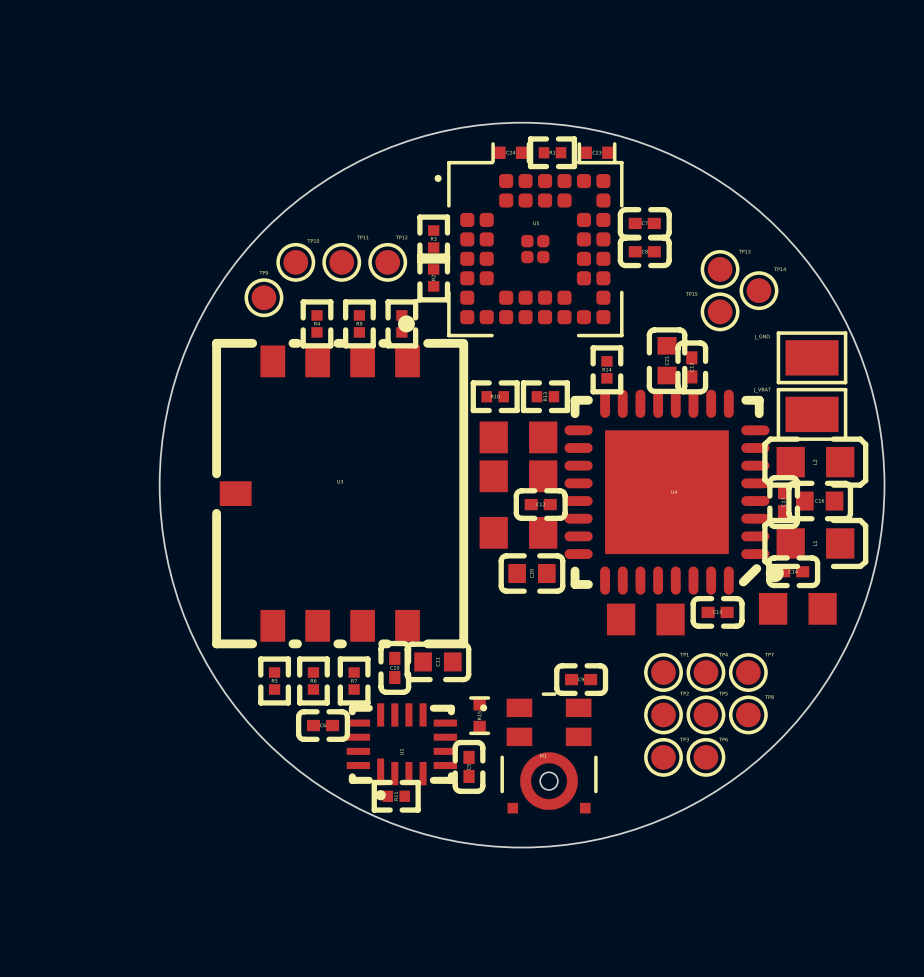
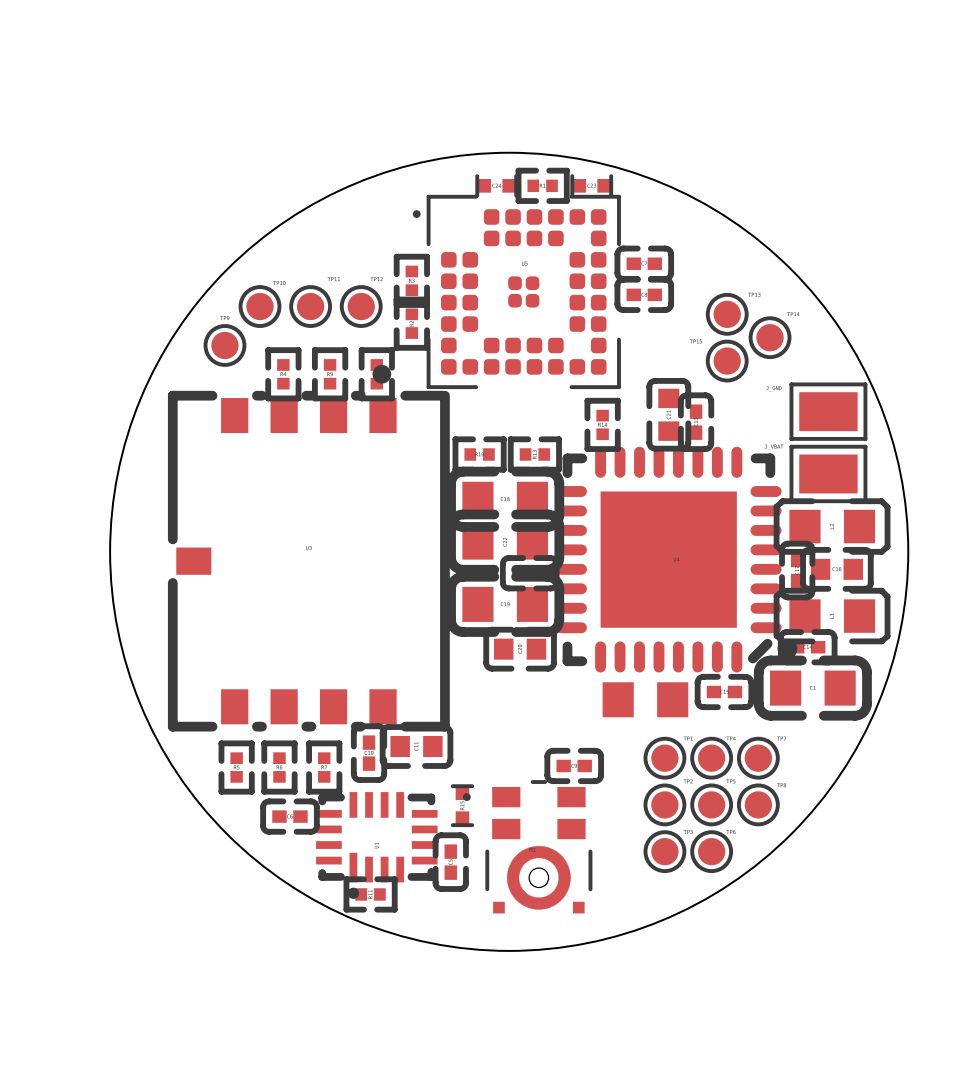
part: (518, 437) -> none
part: none -> (505, 499)
part: (518, 476) -> none
part: none -> (505, 542)
part: none -> (505, 604)
part: none -> (812, 688)

